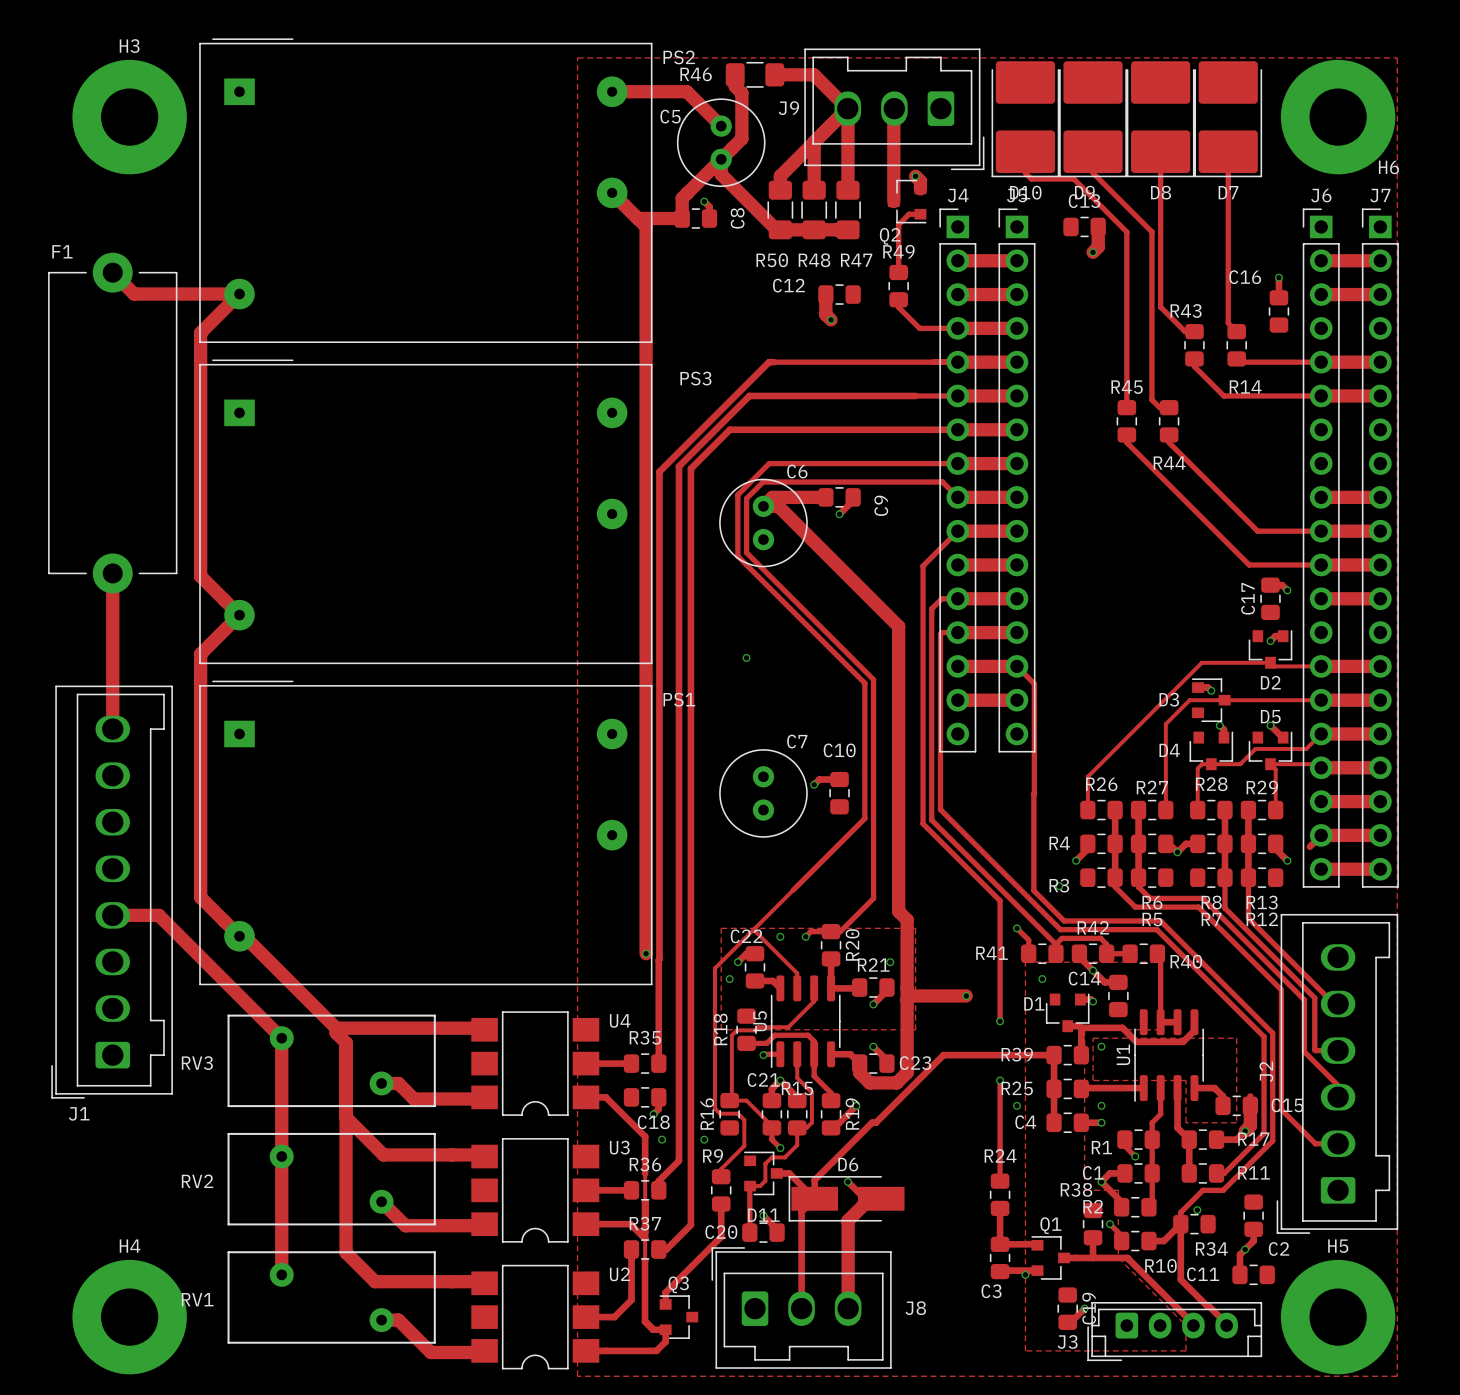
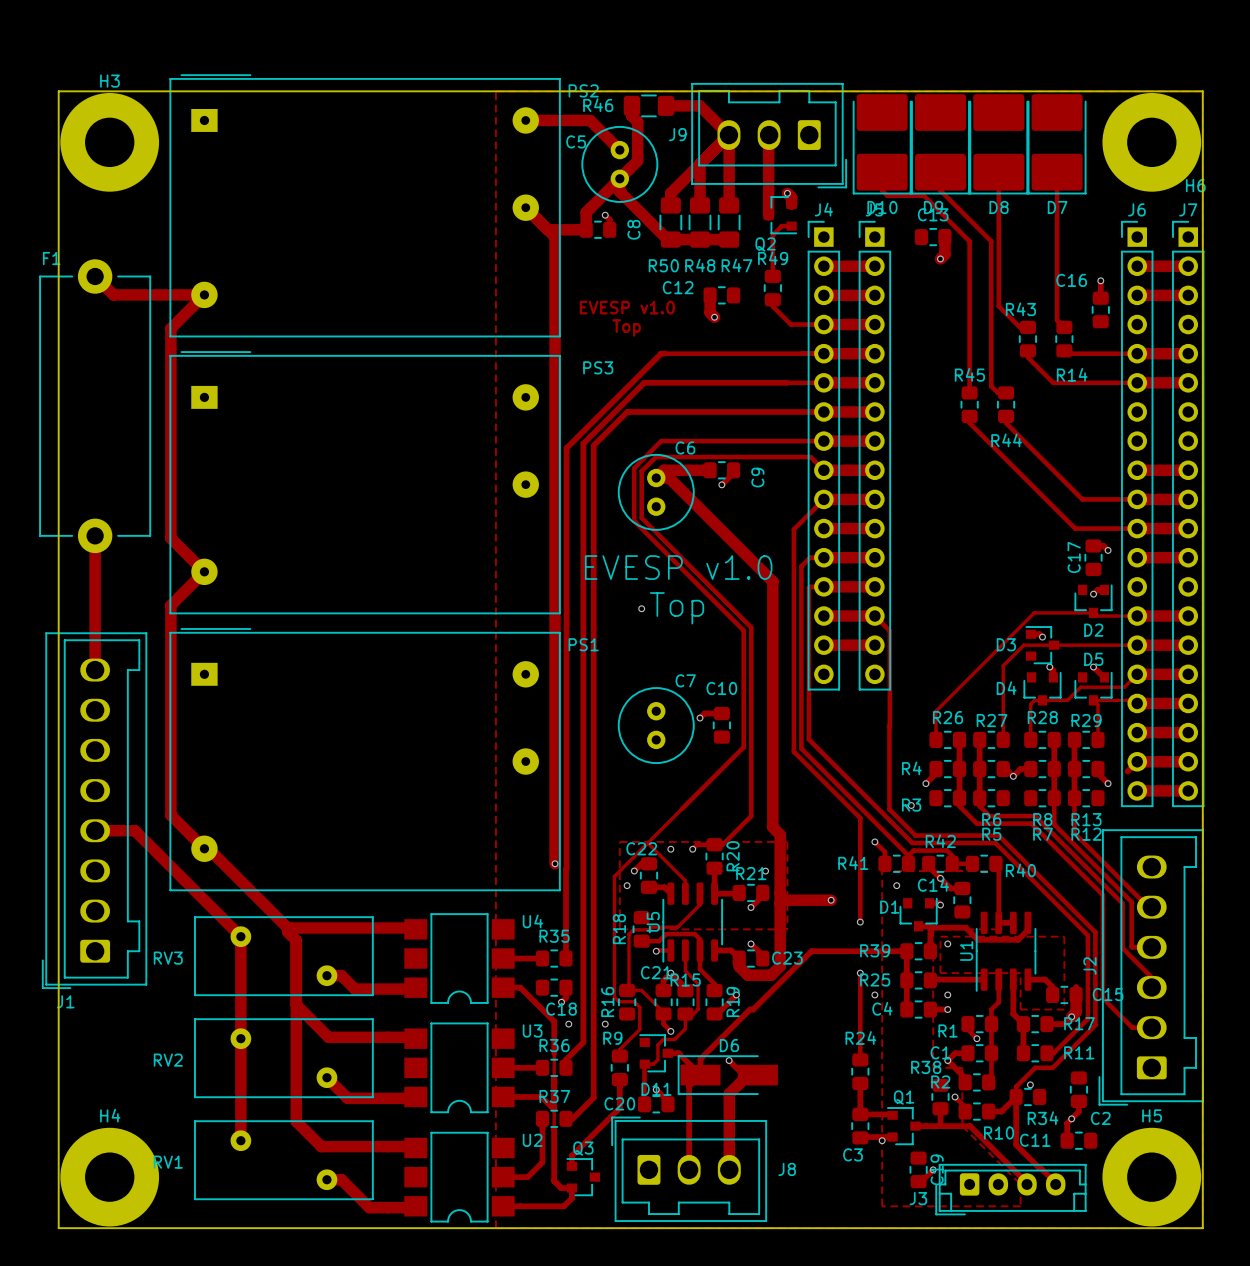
board edge: none -> (58, 91) (58, 1228) (1202, 1228) (1202, 91) (58, 91)
text: none -> EVESP v1.0 (627, 307)
text: none -> Top (626, 327)
text: none -> EVESP v1.0 (678, 567)
text: none -> Top (677, 608)

